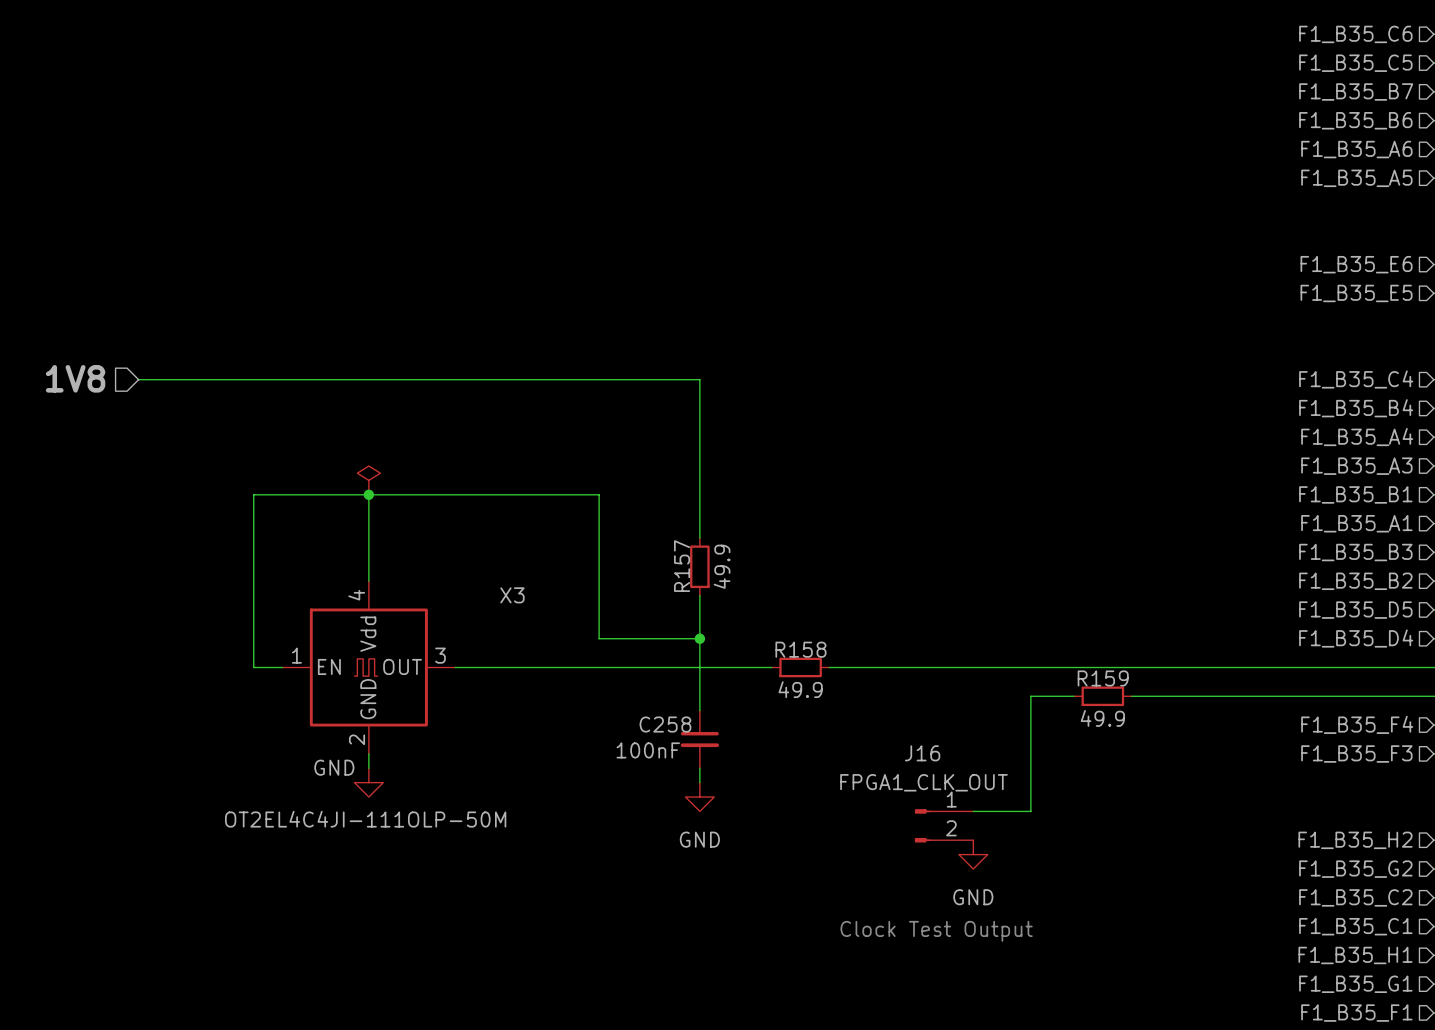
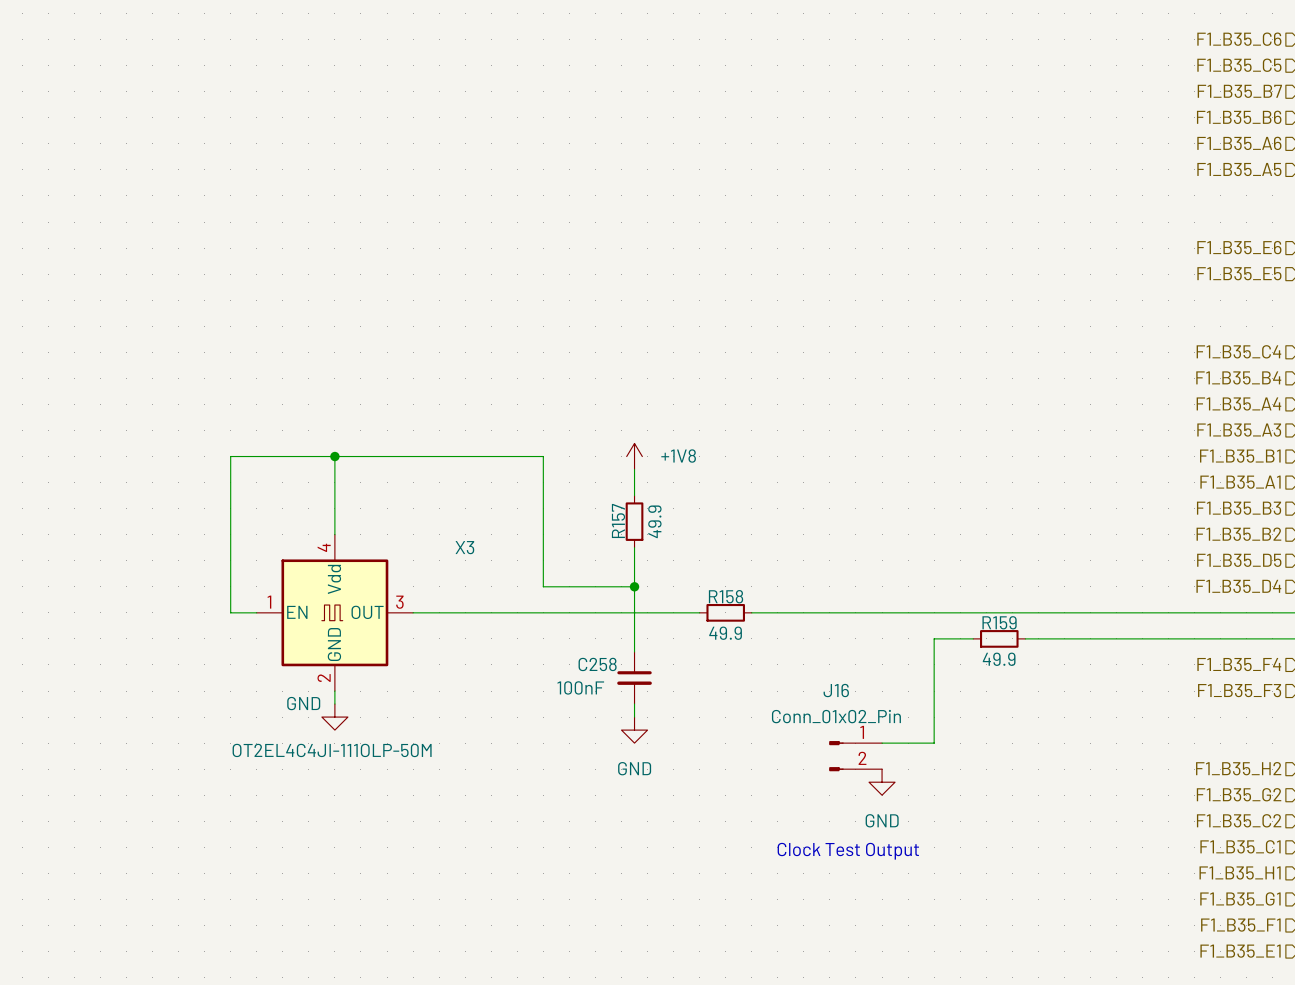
hierarchical label: 1V8 (75, 378) -> none
wire: (138, 379) (699, 379) (699, 509) -> none
power symbol: (368, 480) -> none
power symbol: none -> +1V8 (634, 456)
J16 value: FPGA1_CLK_OUT (923, 782) -> Conn_01x02_Pin (836, 716)

